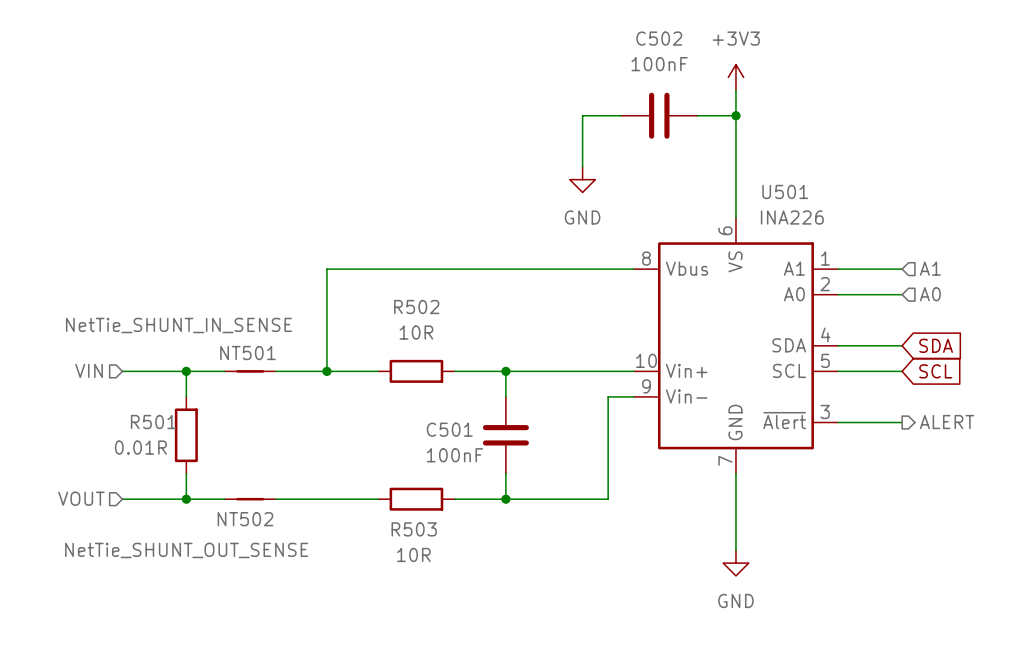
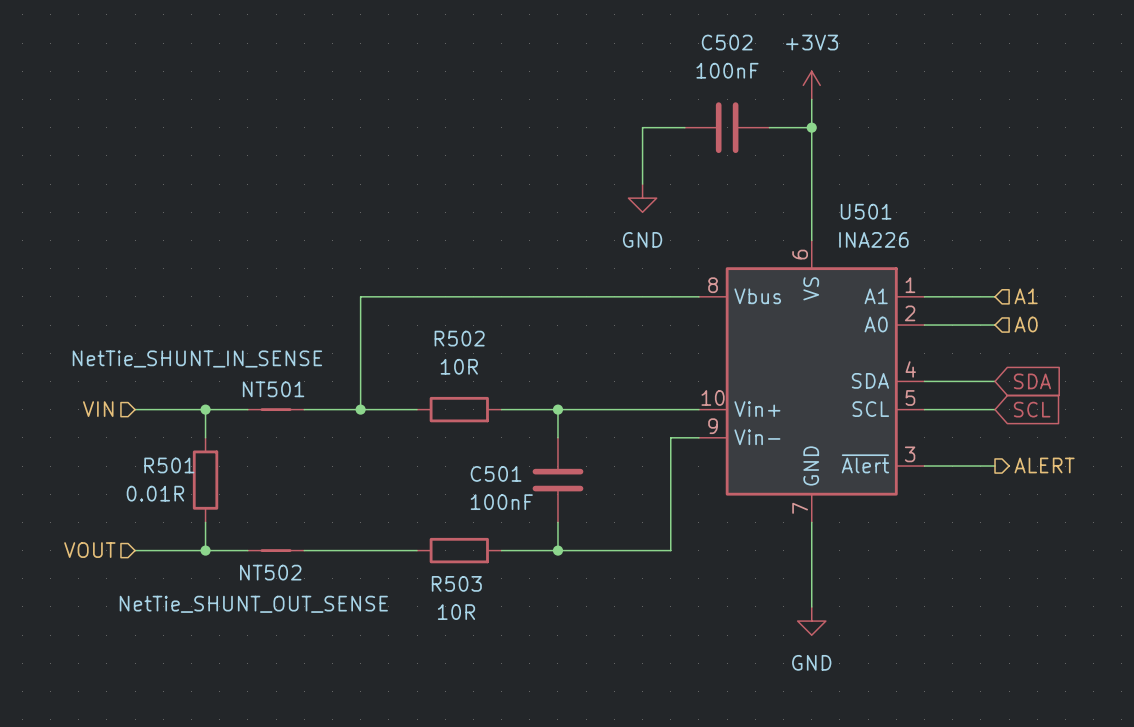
NT502 value position: NetTie_SHUNT_OUT_SENSE (186, 550) -> NetTie_SHUNT_OUT_SENSE (253, 604)

